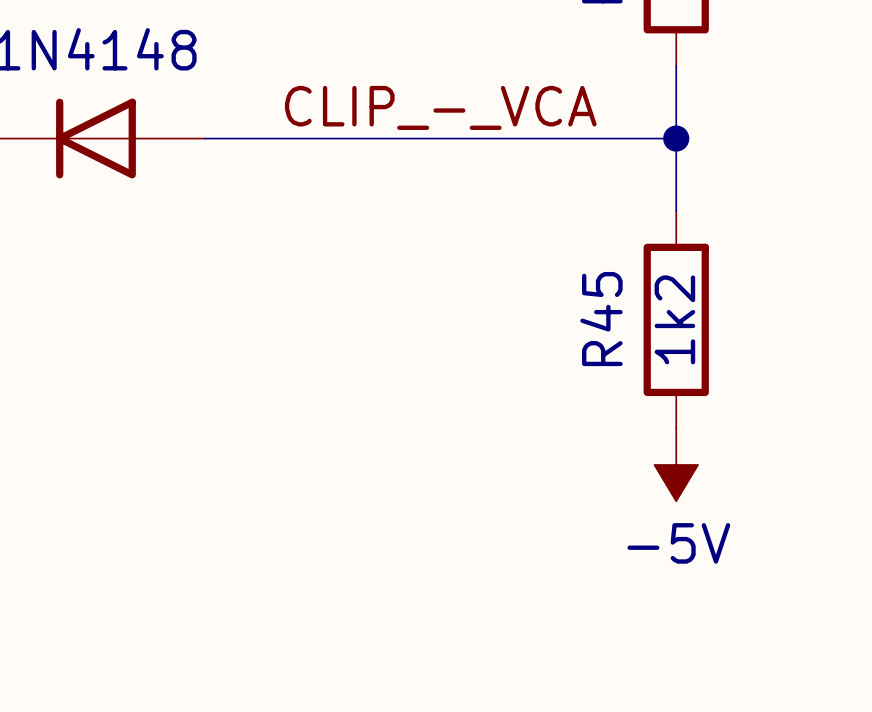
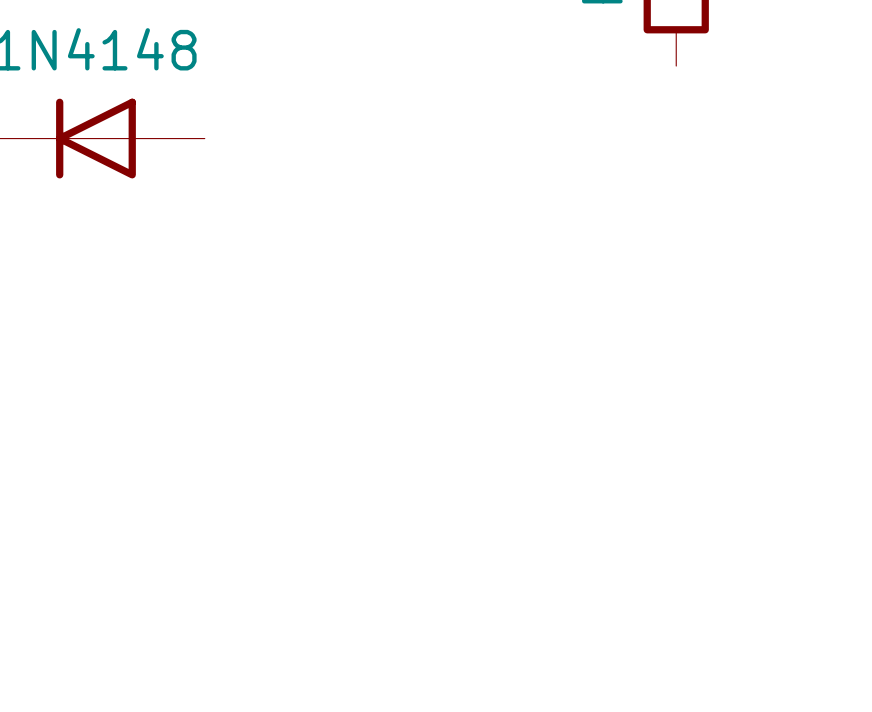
wire: (676, 66) (676, 211) -> none
label: CLIP_-_VCA (440, 107) -> none
wire: (204, 138) (676, 138) -> none
junction: (676, 138) -> none
R45: 1k2 (676, 319) -> none
power symbol: -5V (676, 464) -> none

